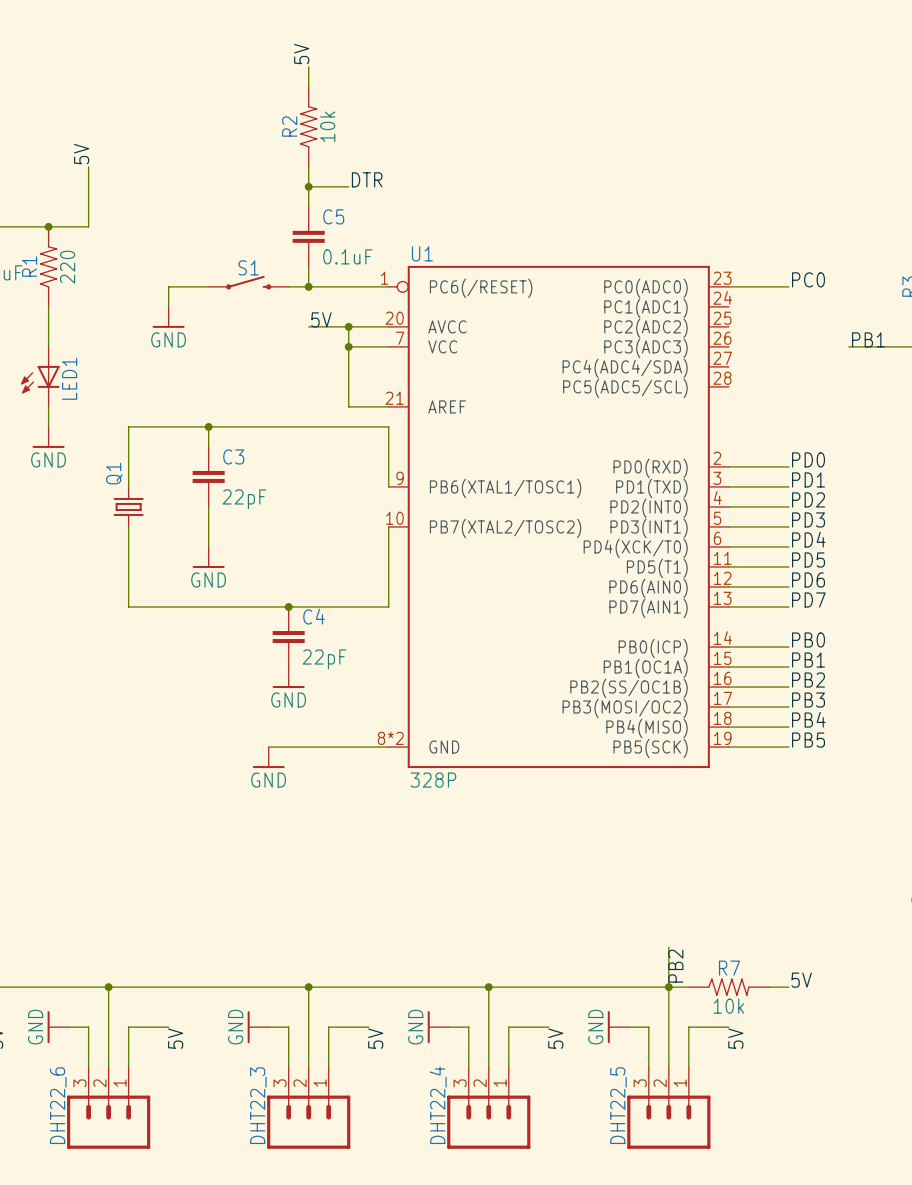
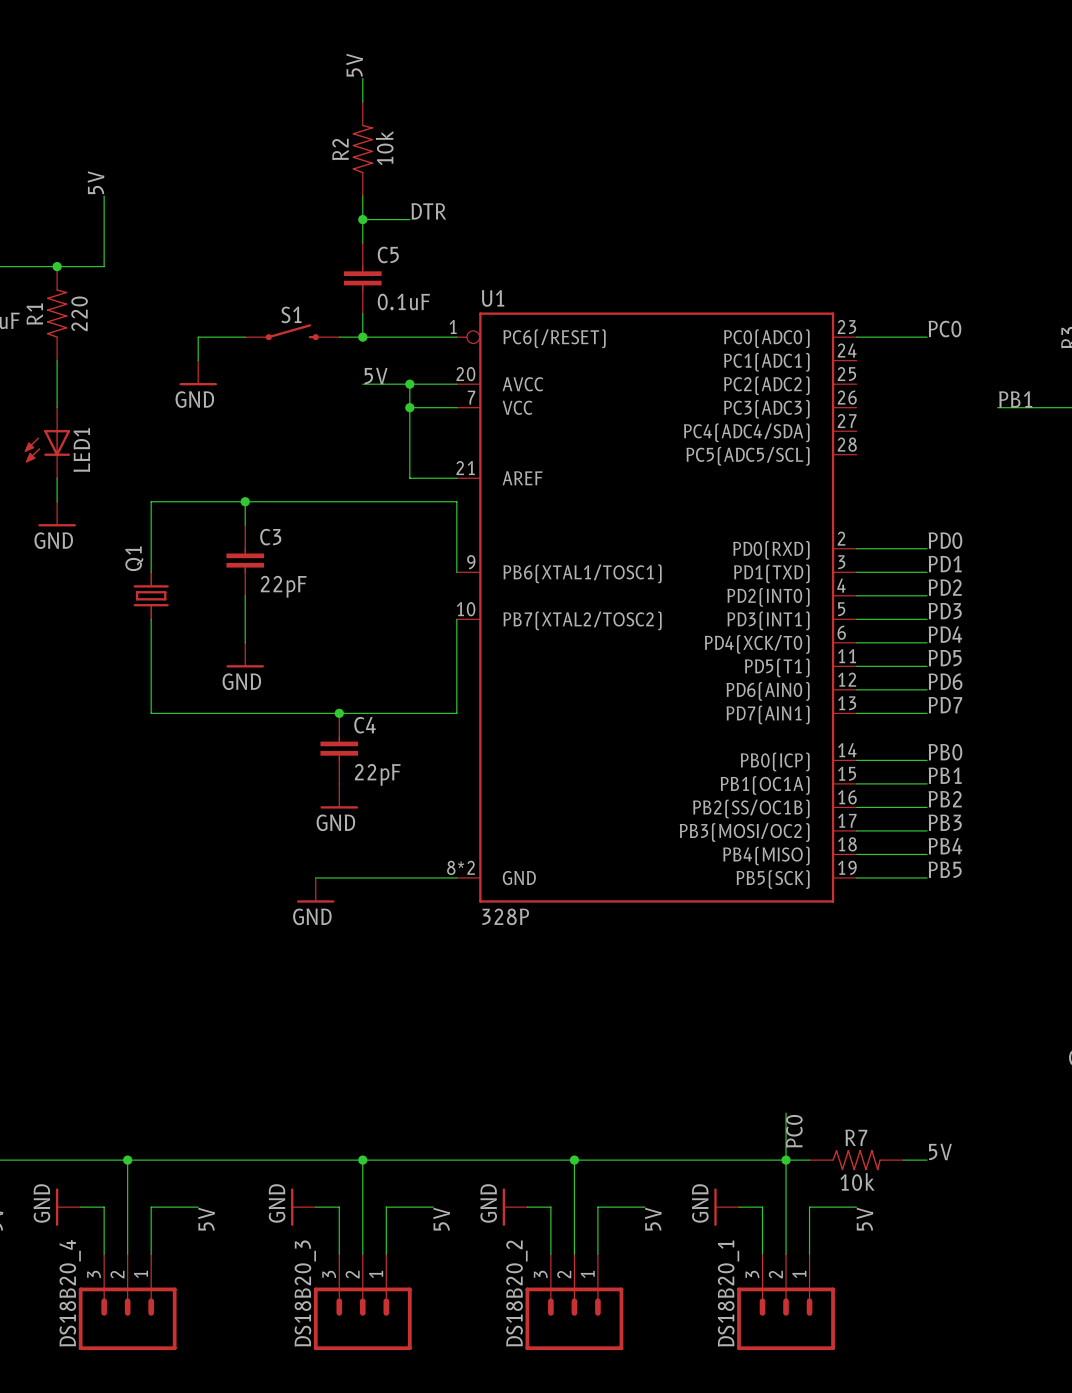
label: PB2 (675, 966) -> PC0 (794, 1131)
DHT22_6 name: DHT22_6 (58, 1105) -> DS18B20_4 (70, 1293)
DHT22_3 name: DHT22_3 (258, 1105) -> DS18B20_3 (305, 1293)
DHT22_4 name: DHT22_4 (438, 1105) -> DS18B20_2 (516, 1293)
DHT22_5 name: DHT22_5 (618, 1105) -> DS18B20_1 (728, 1293)

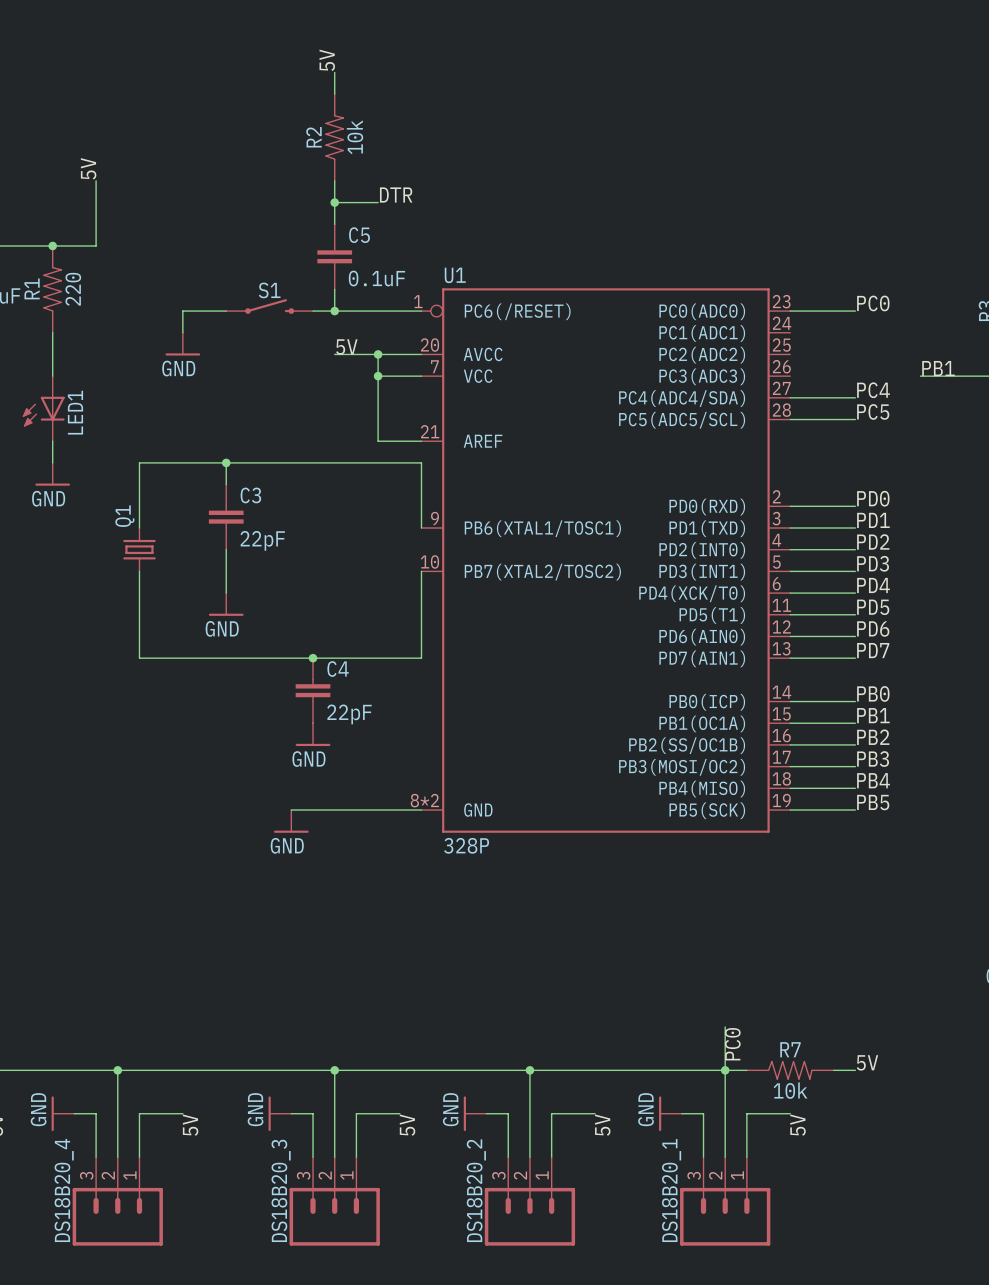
label: none -> PC4 (873, 390)
wire: none -> (790, 397) (855, 397)
label: none -> PC5 (873, 411)
wire: none -> (790, 419) (855, 419)

